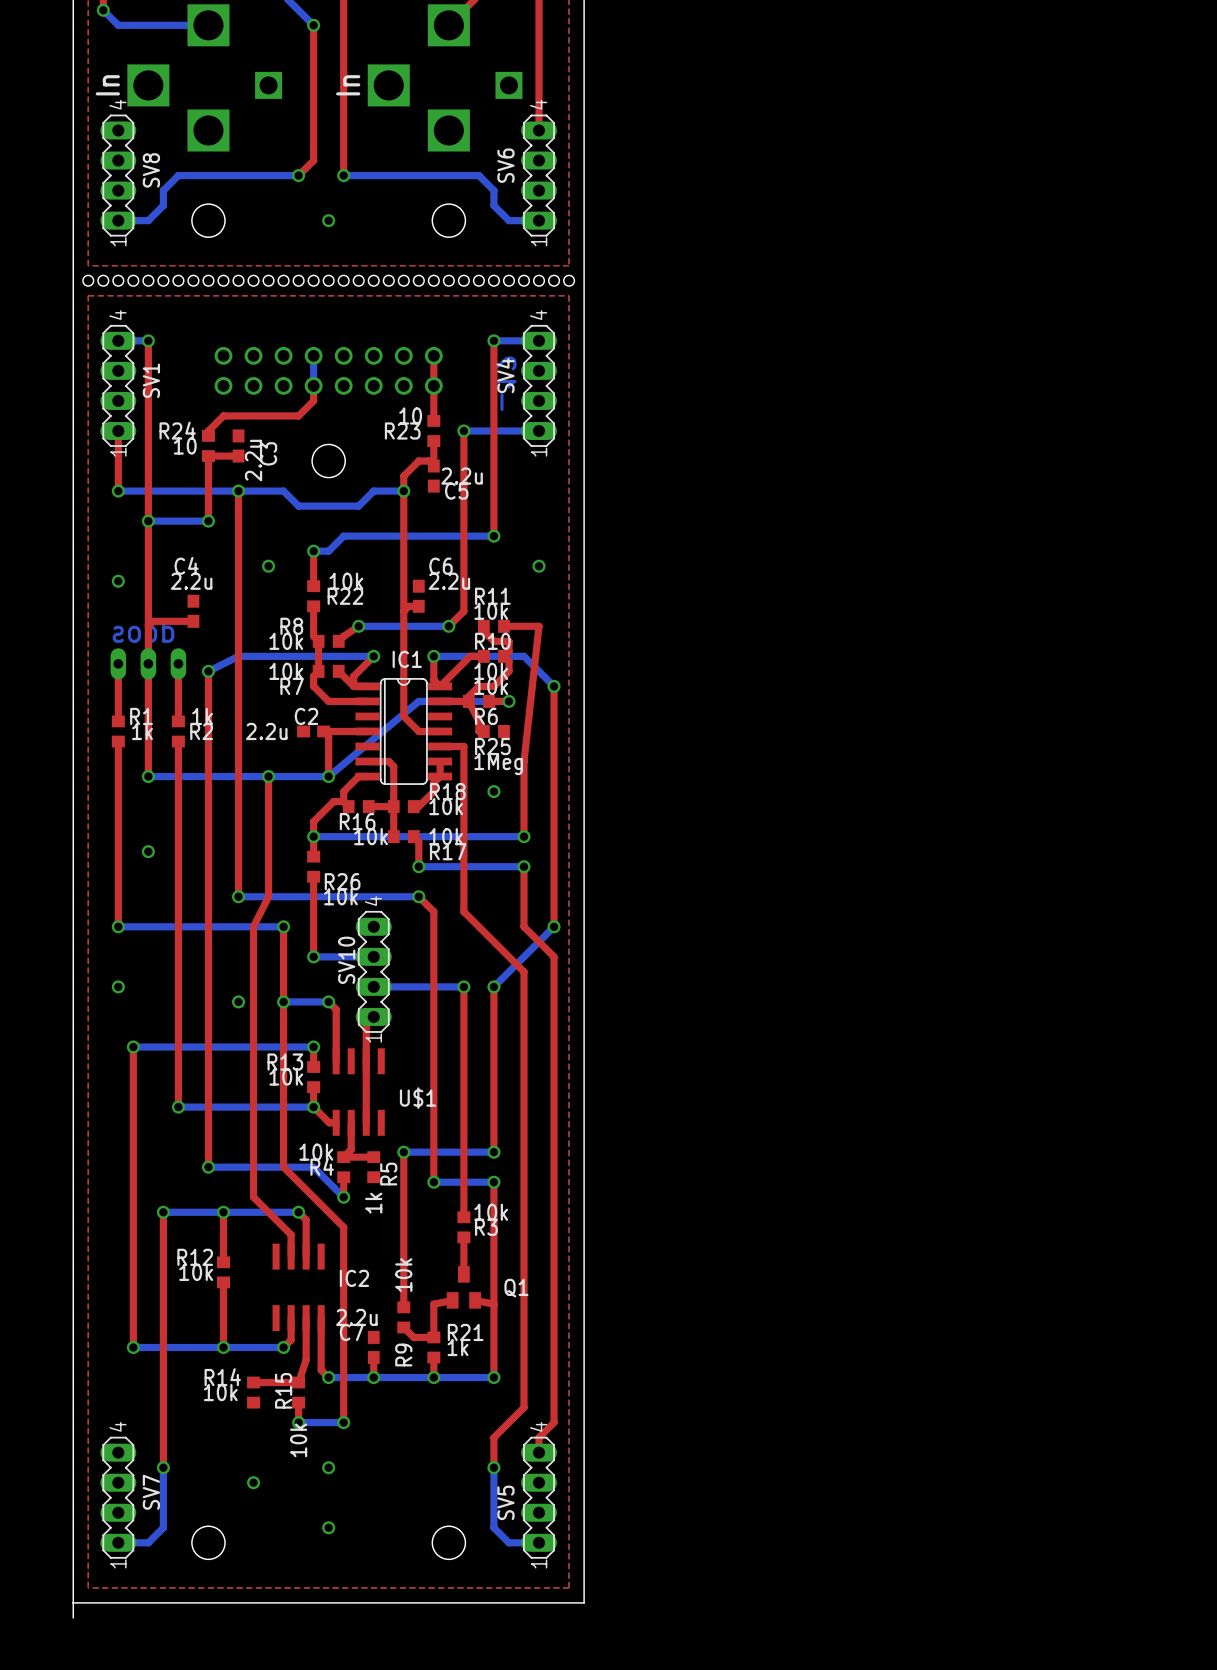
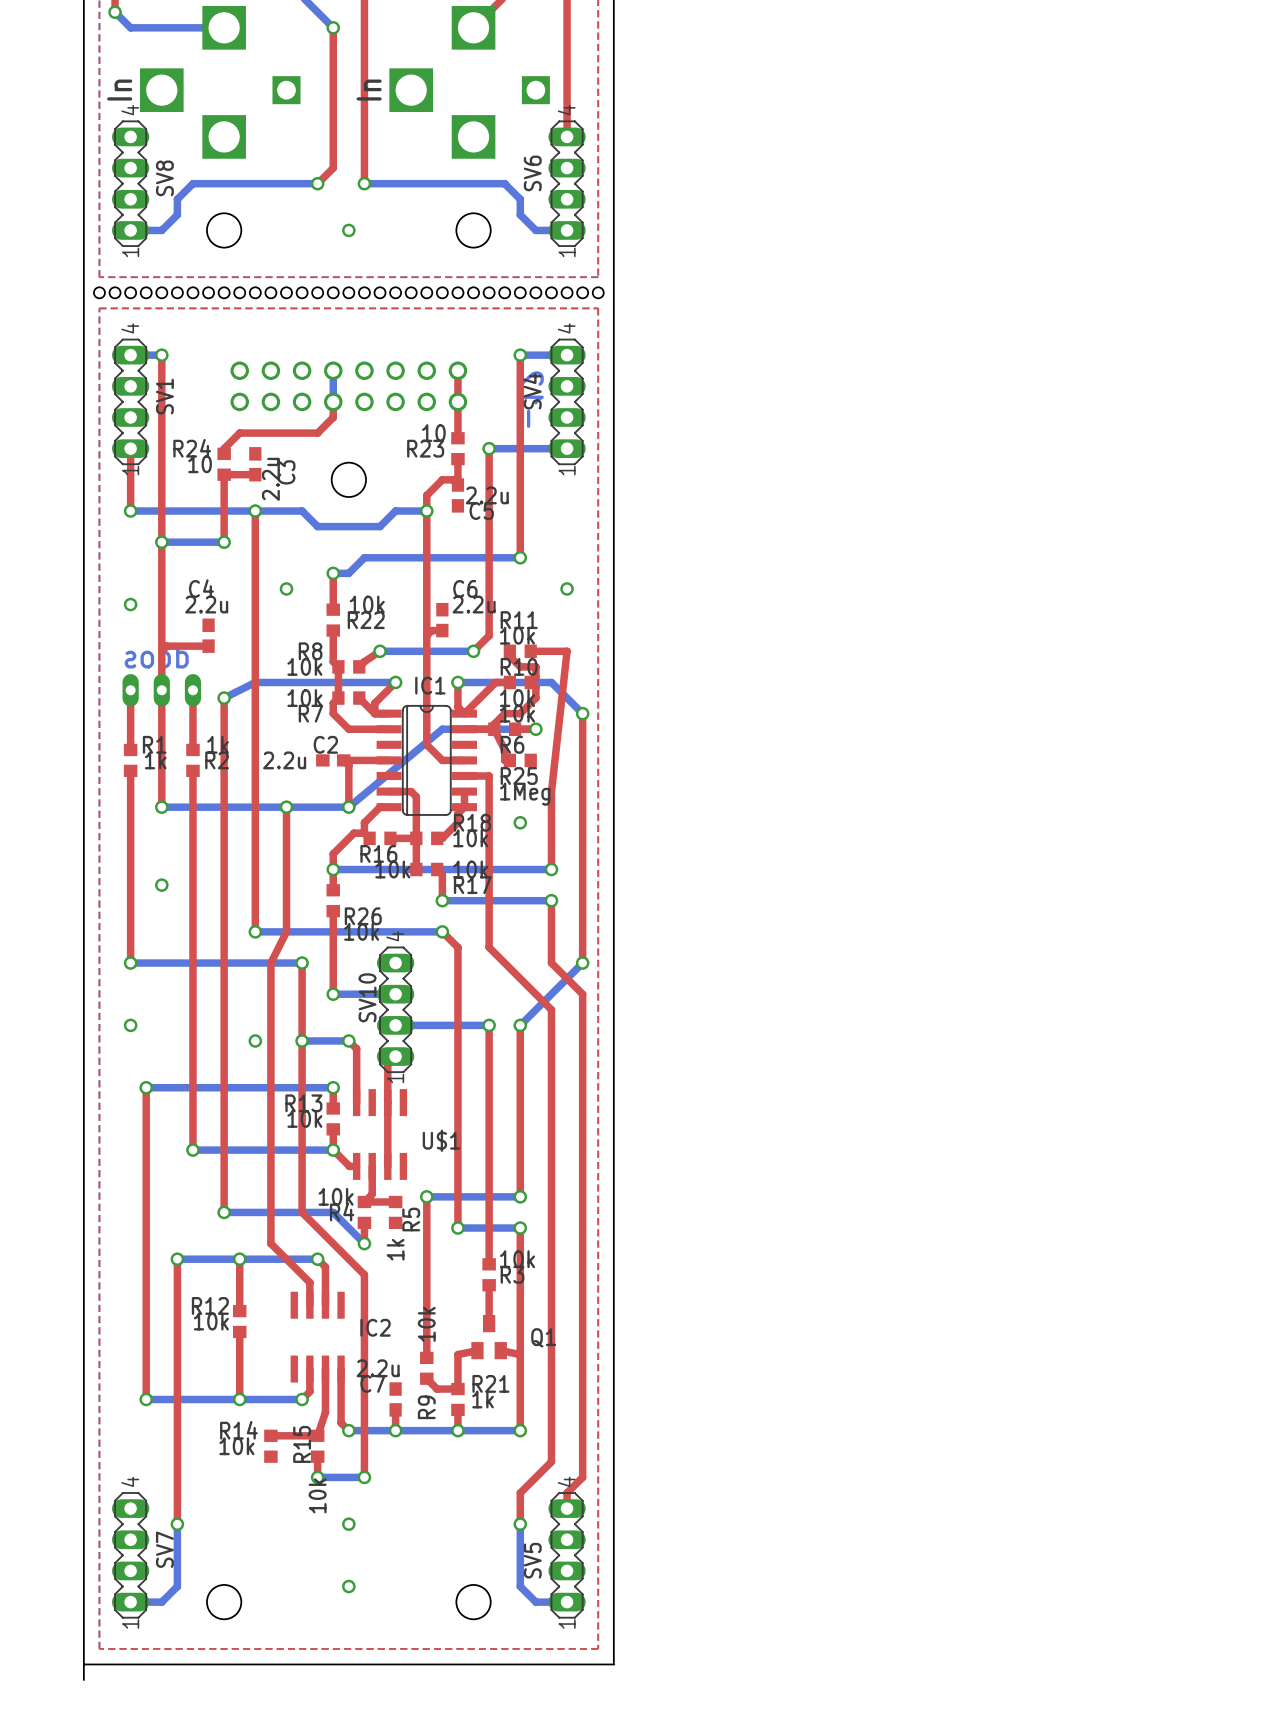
via: (253, 1482) -> none

